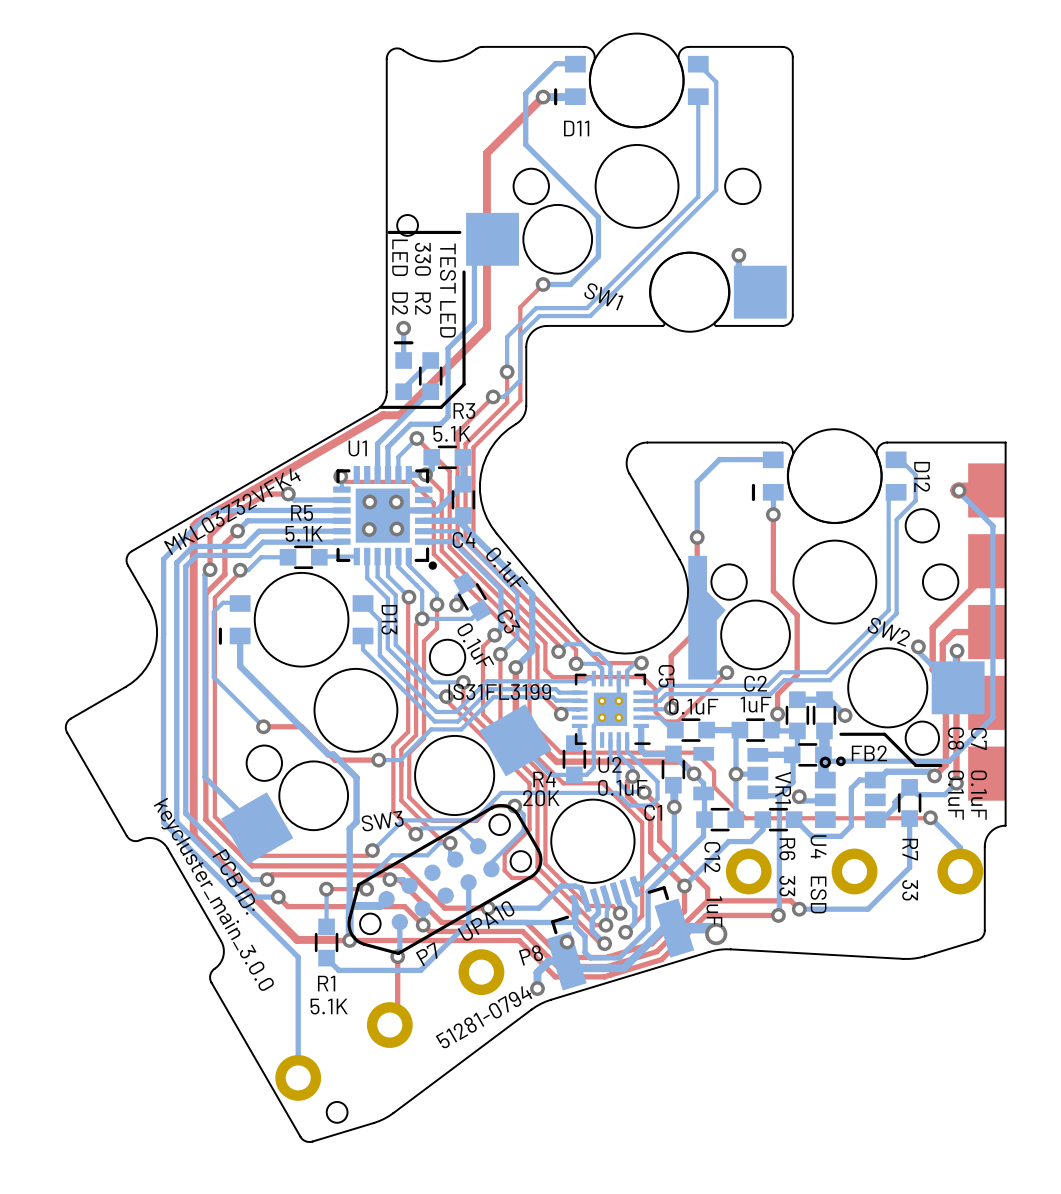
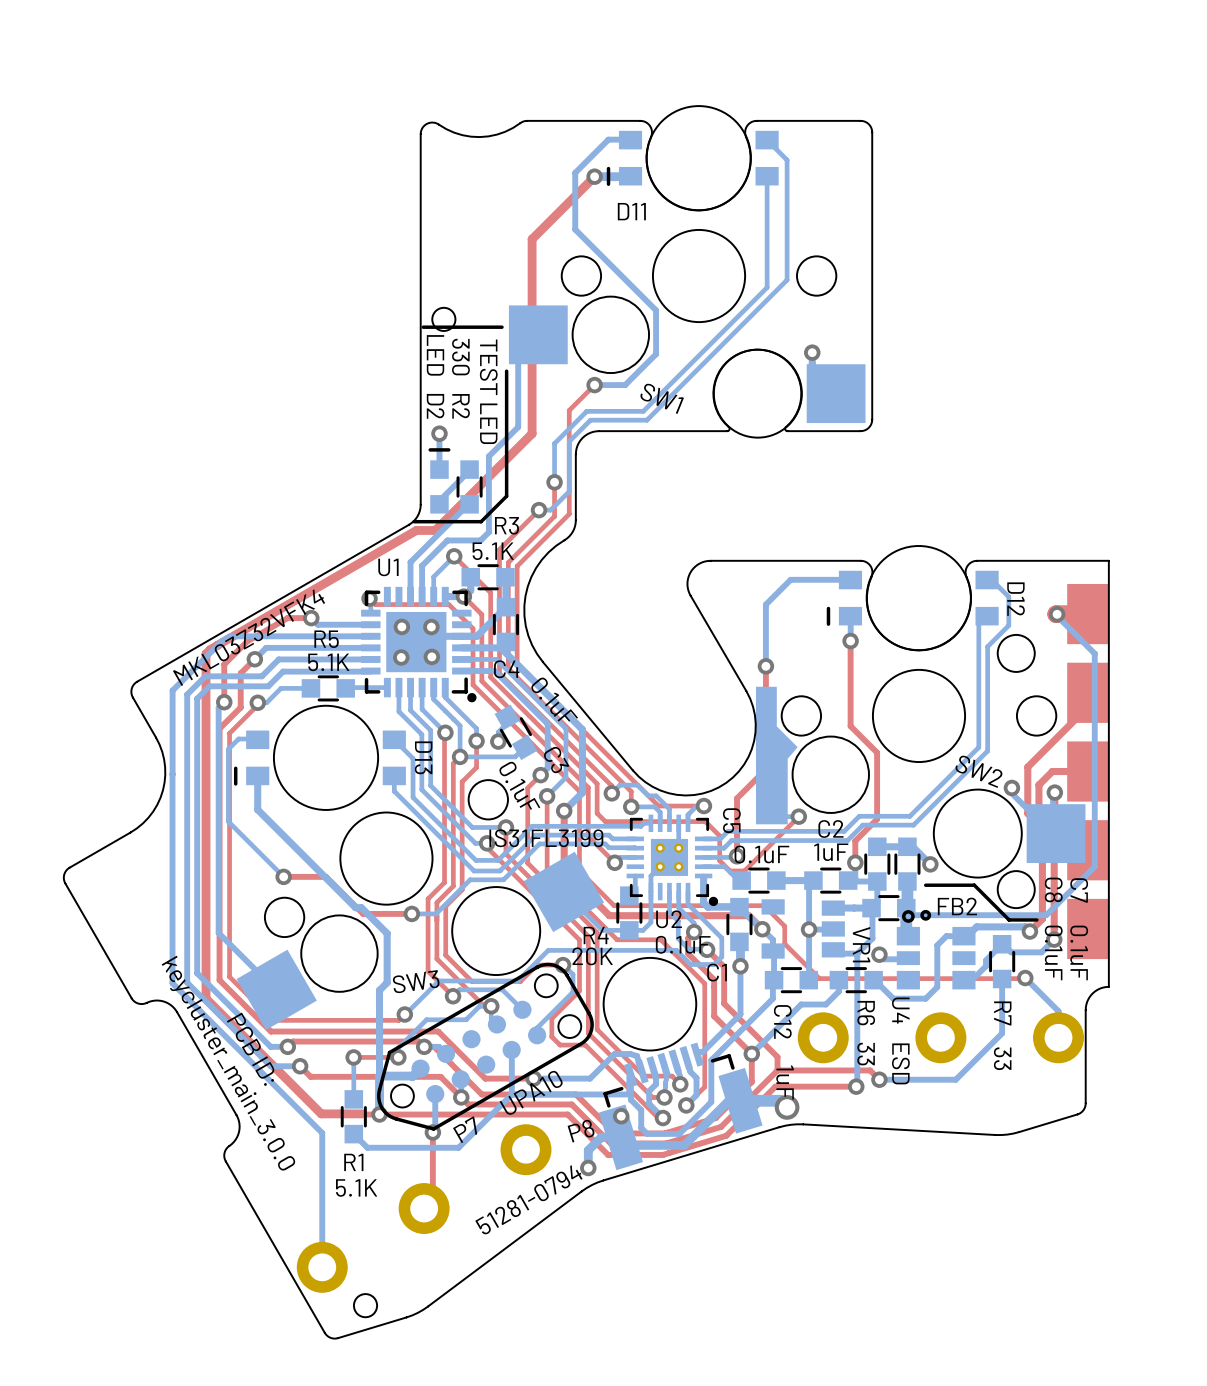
U2 footprint: [571, 670, 651, 748] -> [626, 814, 719, 907]

